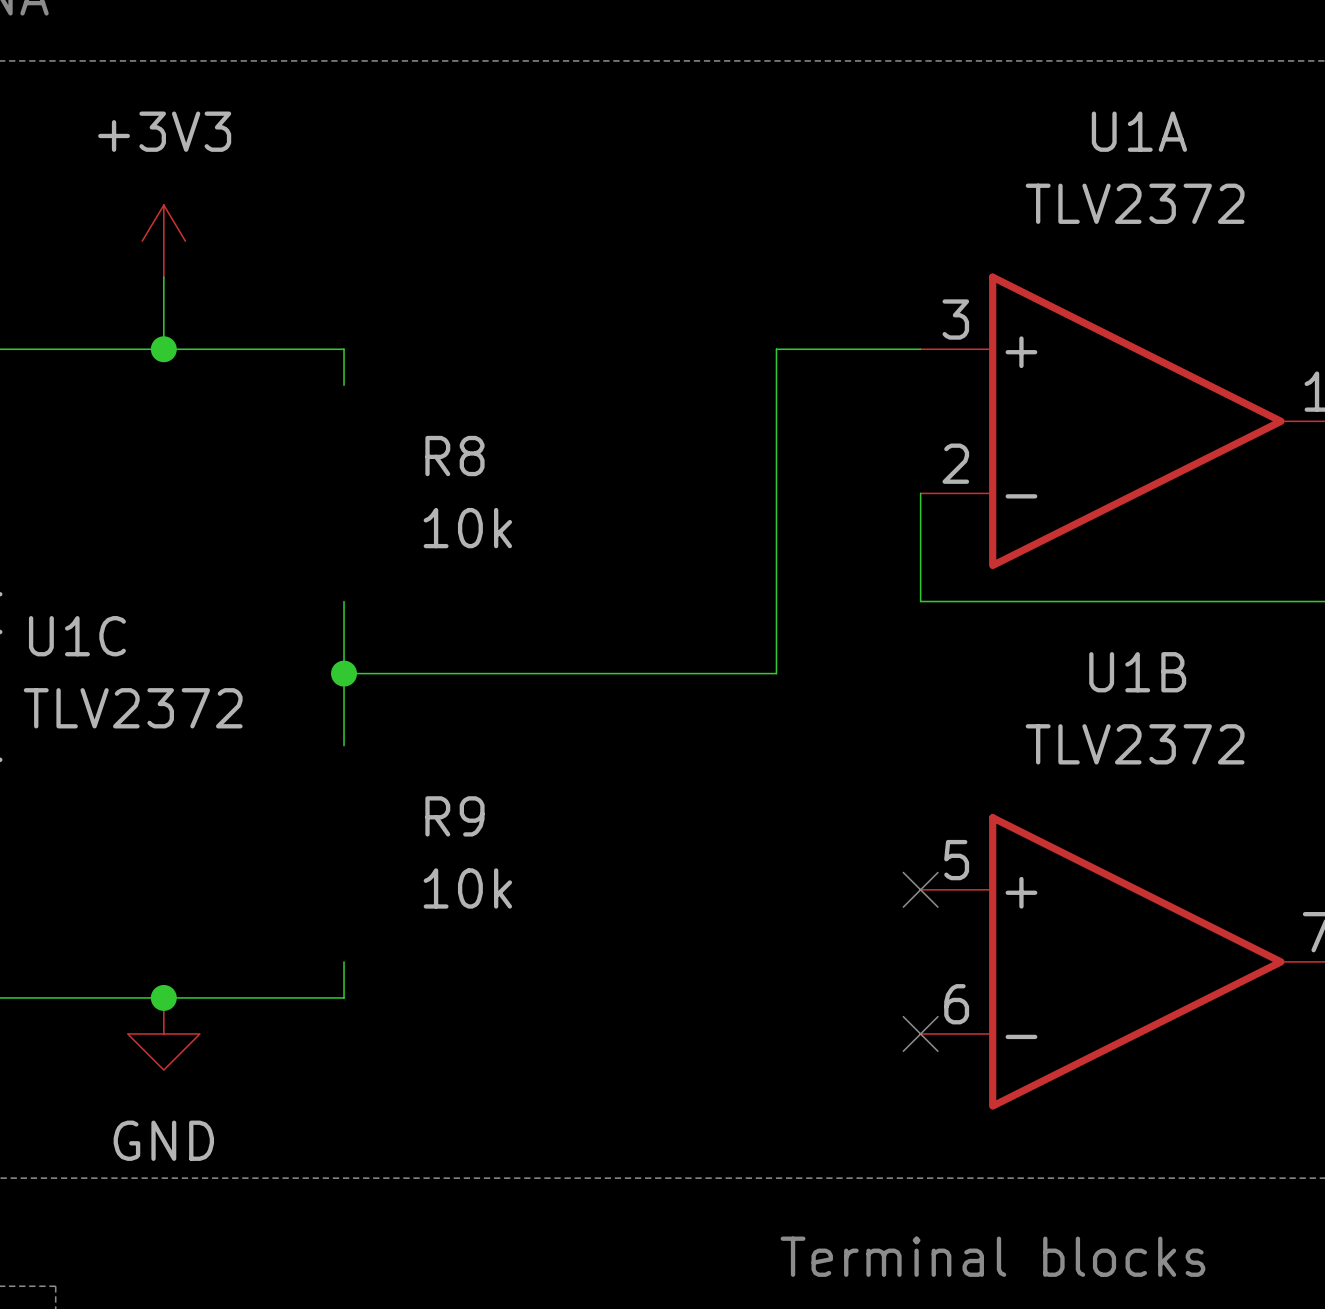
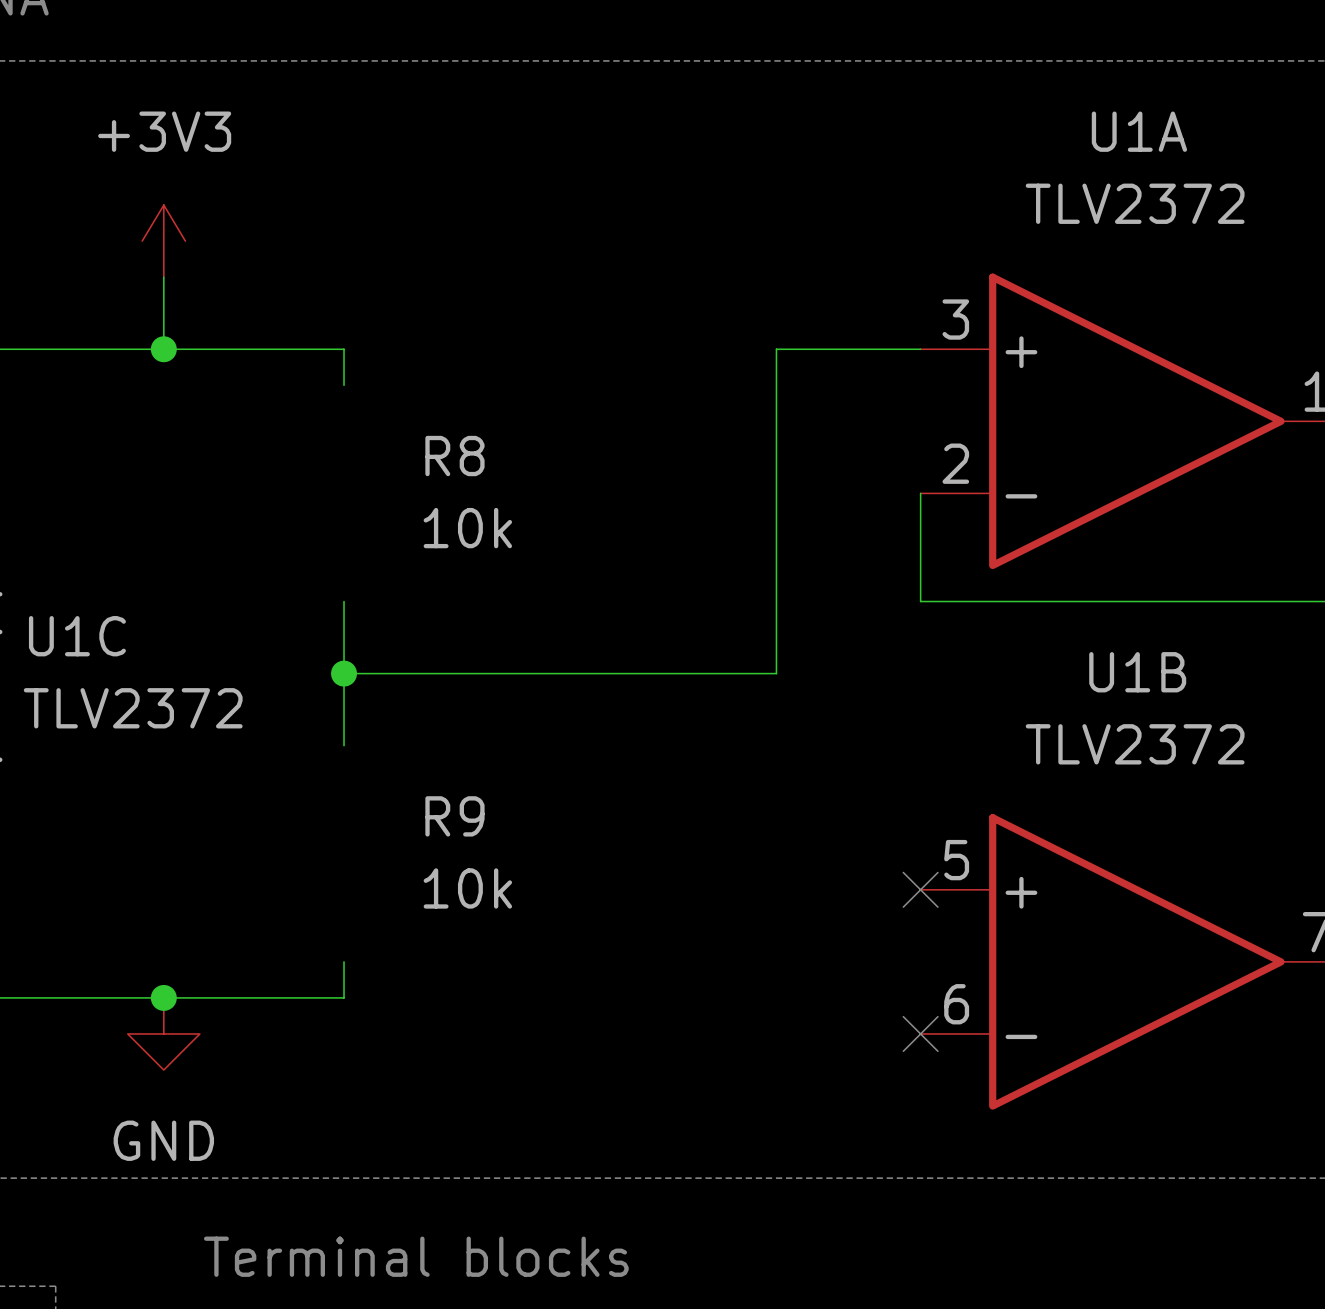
text position: Terminal blocks (992, 1256) -> Terminal blocks (416, 1256)

